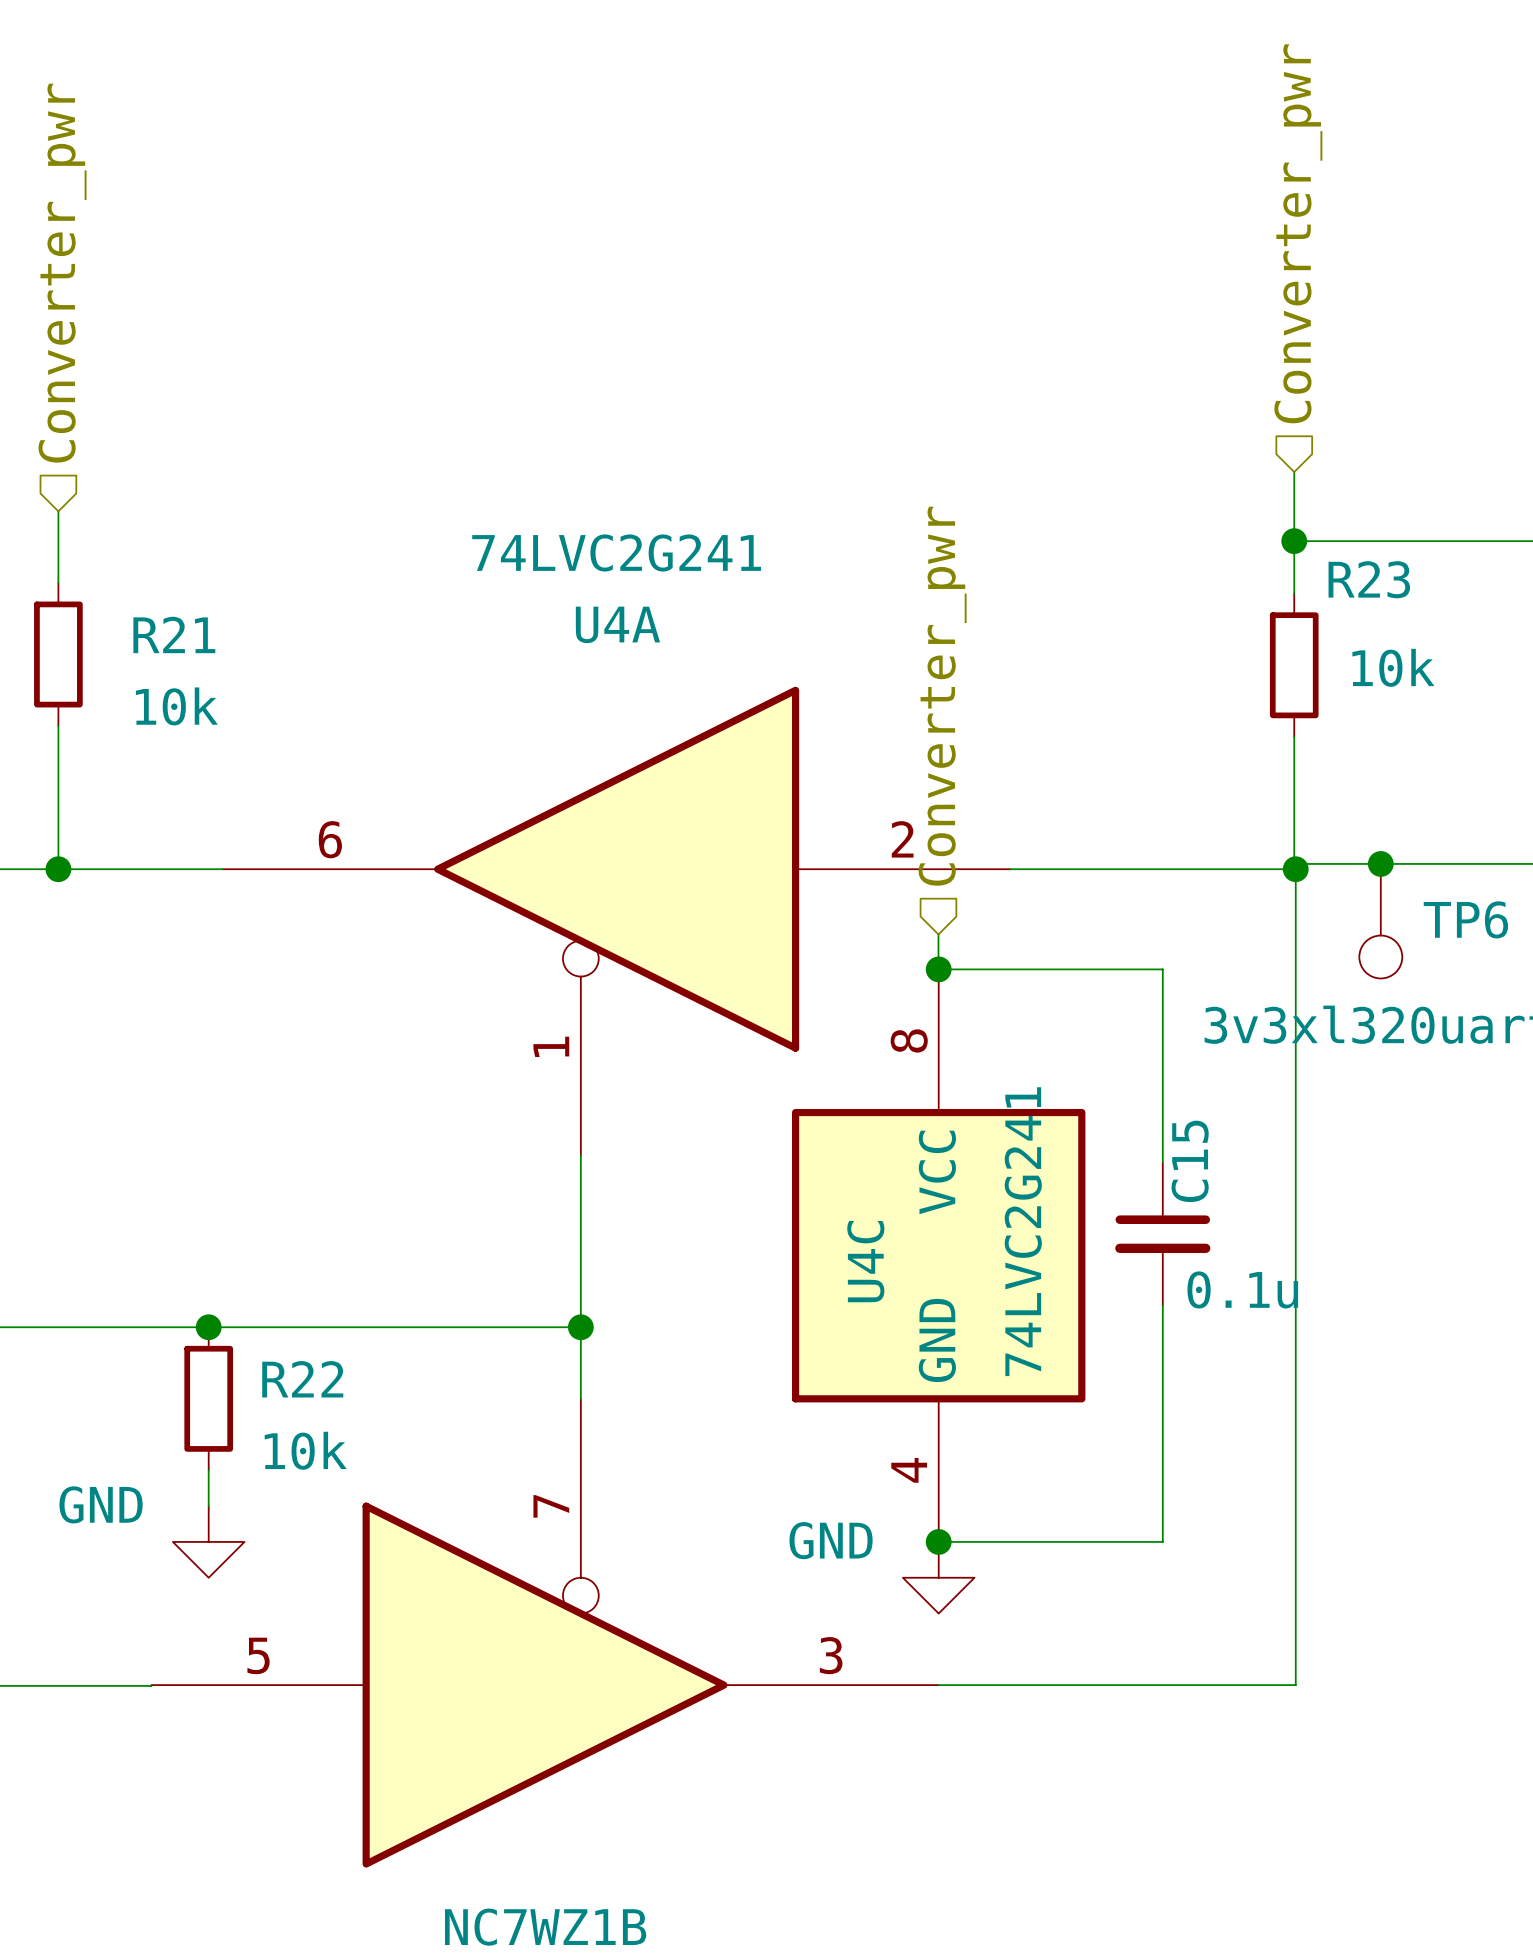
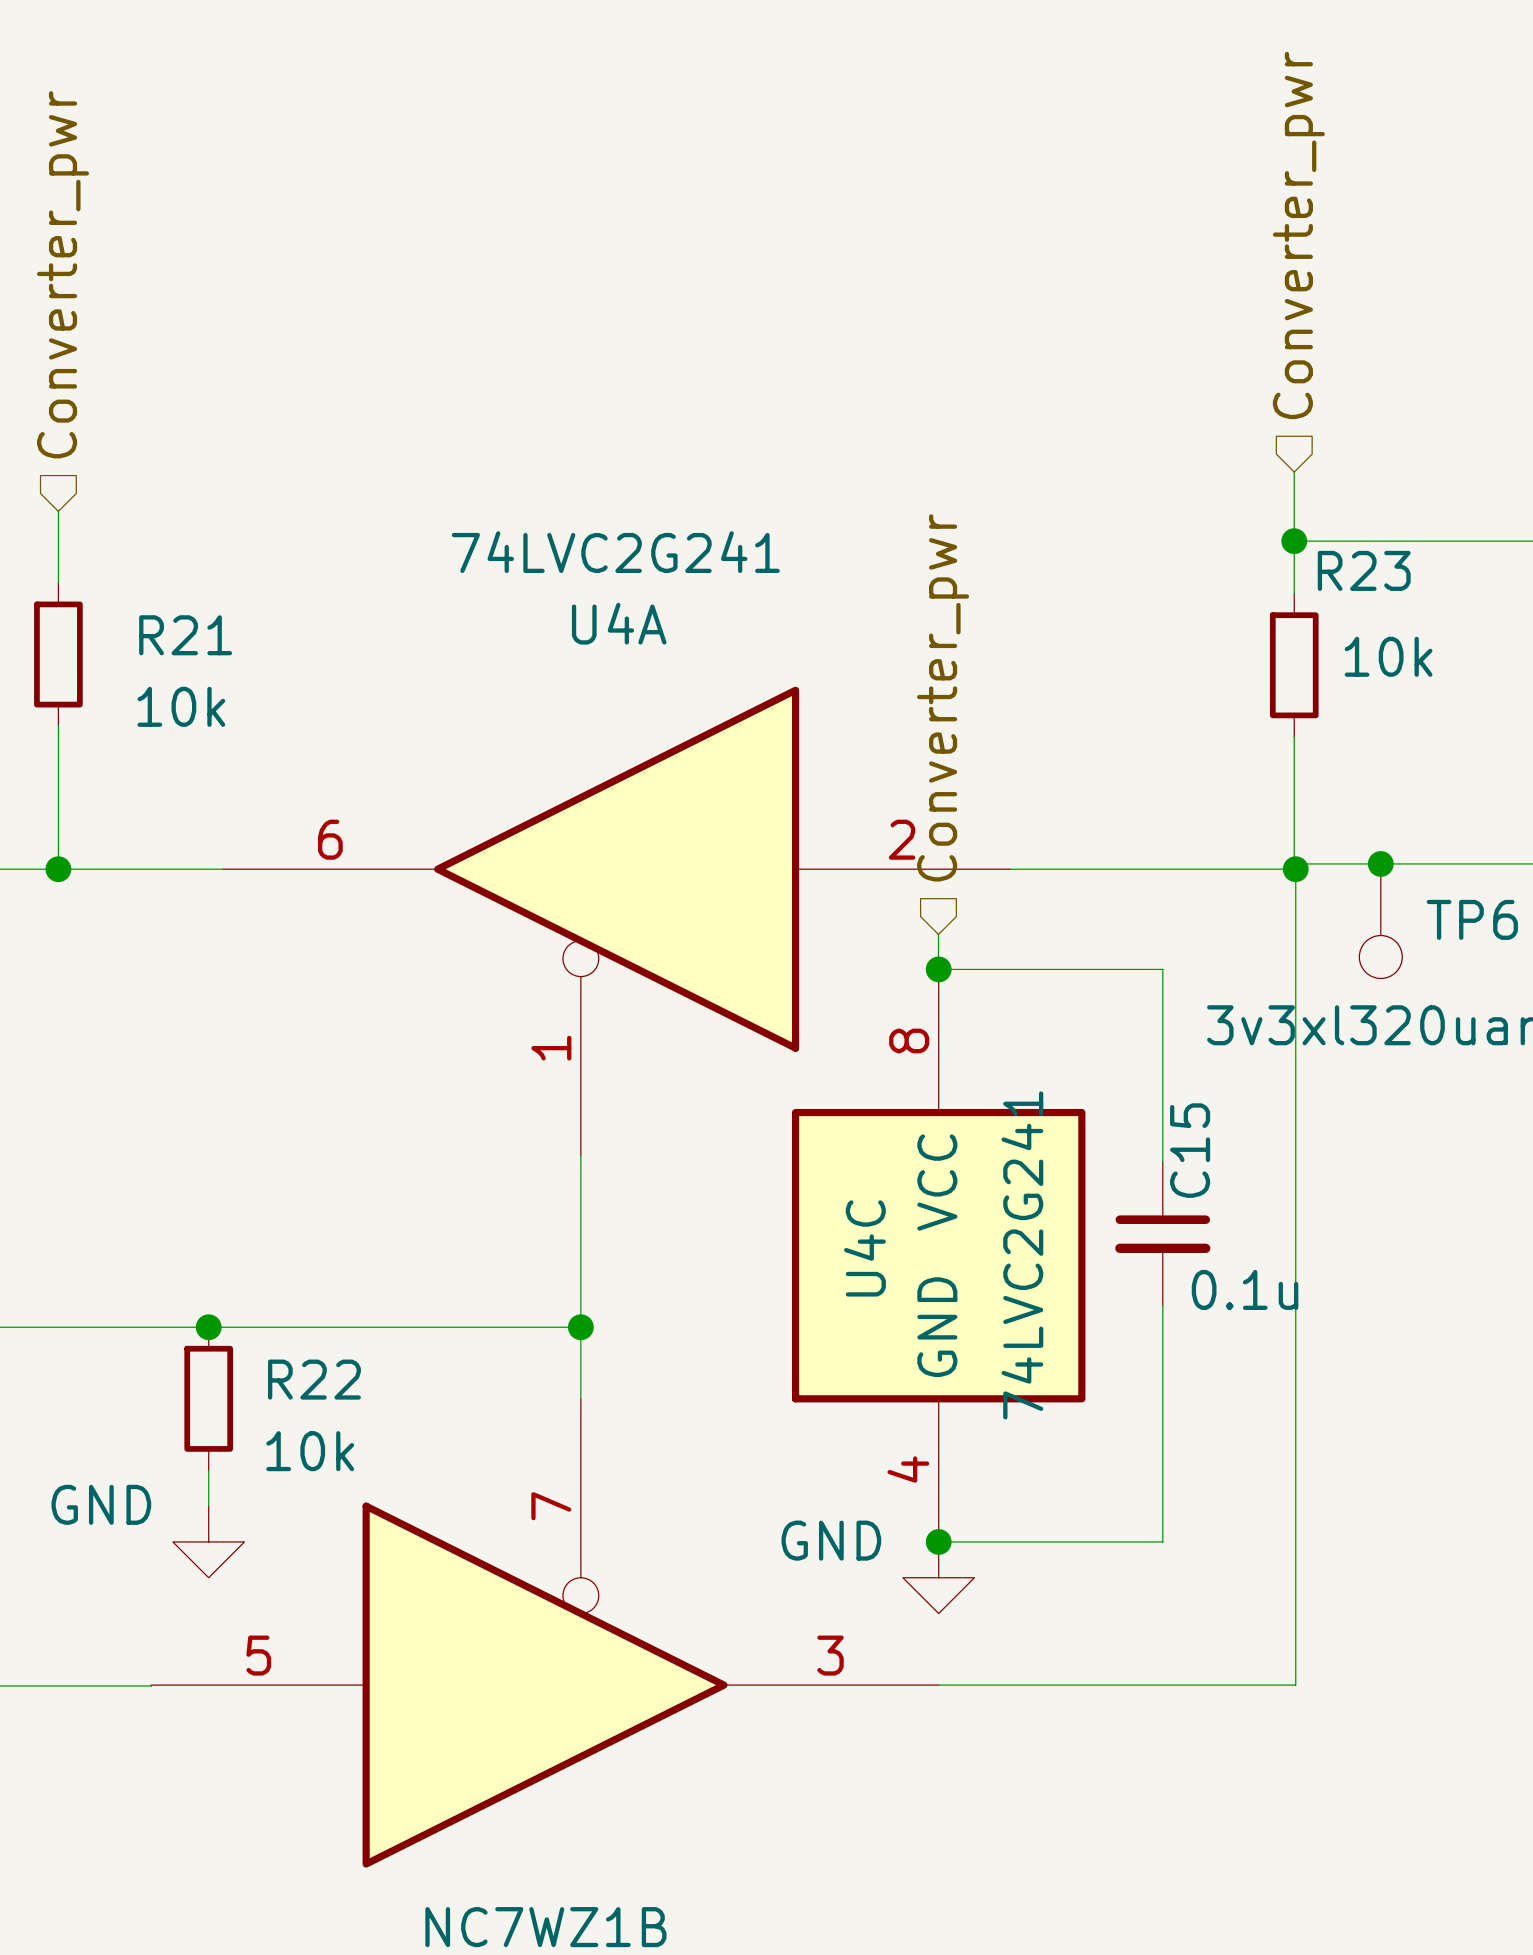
R23 name position: R23 (1369, 579) -> R23 (1364, 570)
R23 value position: 10k (1393, 667) -> 10k (1388, 656)

